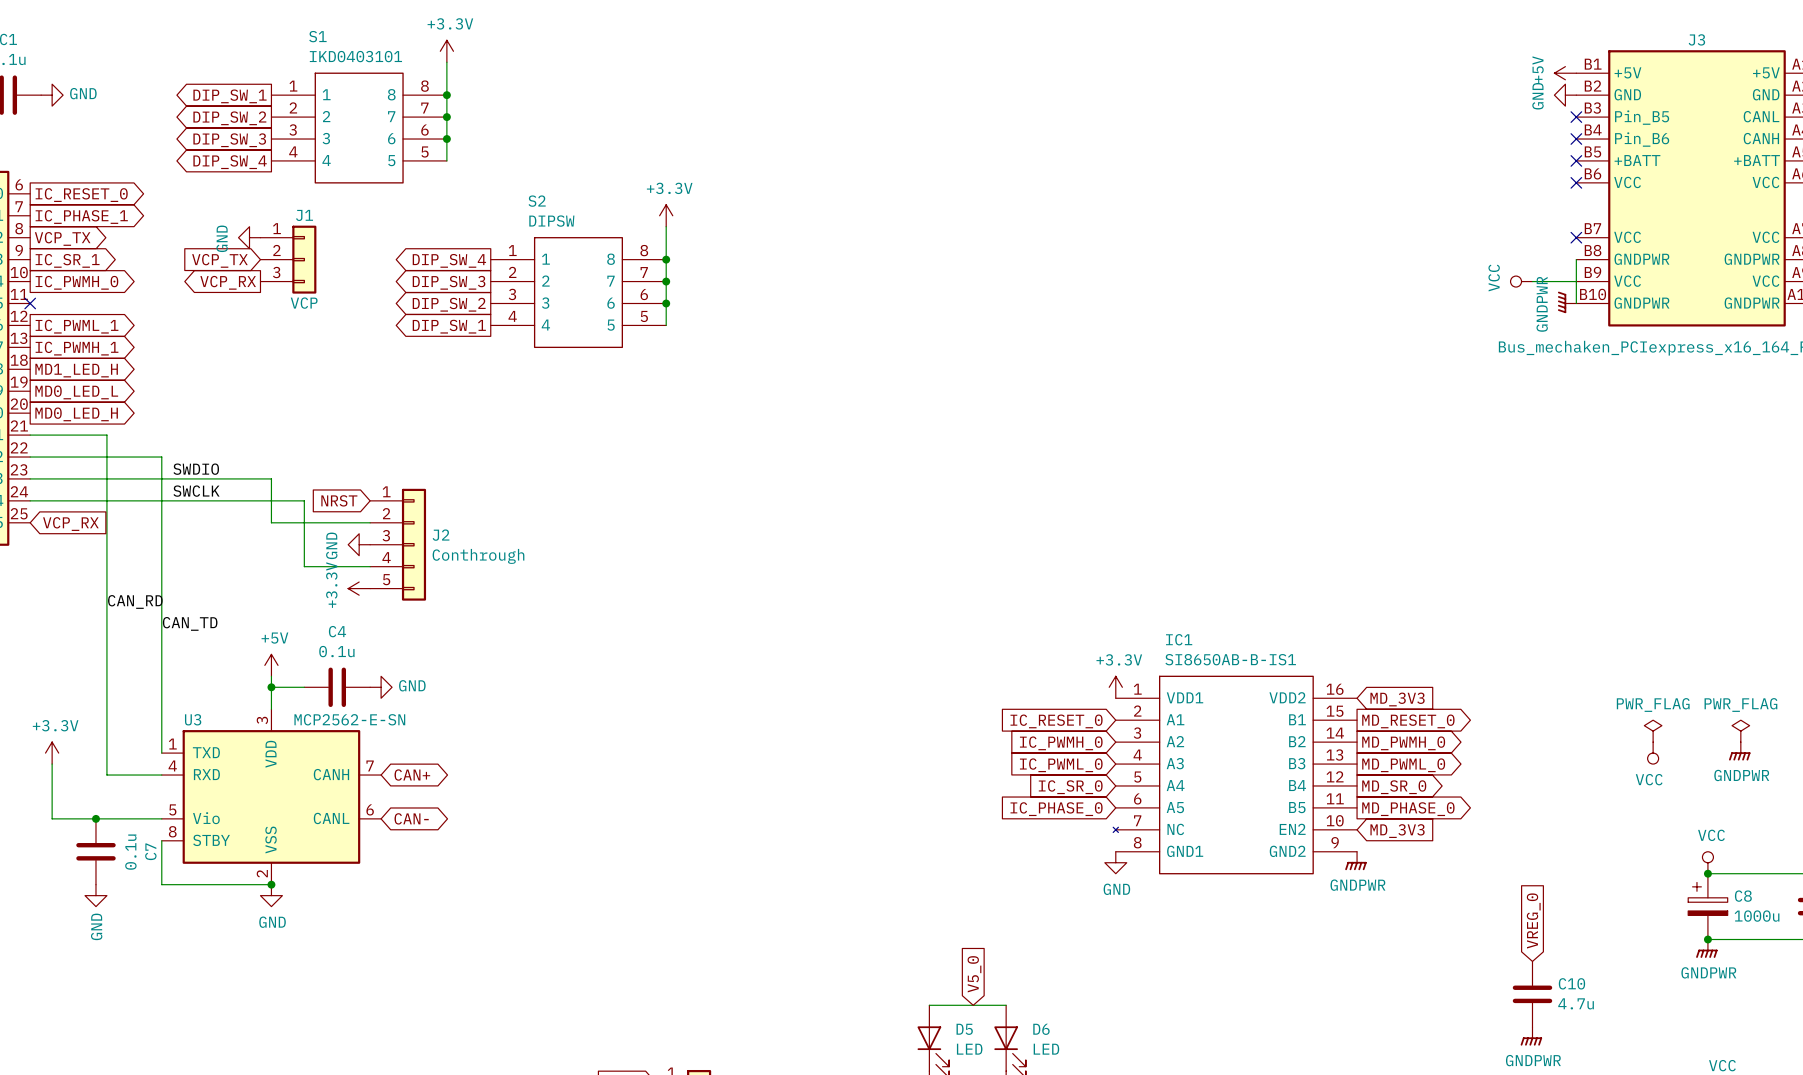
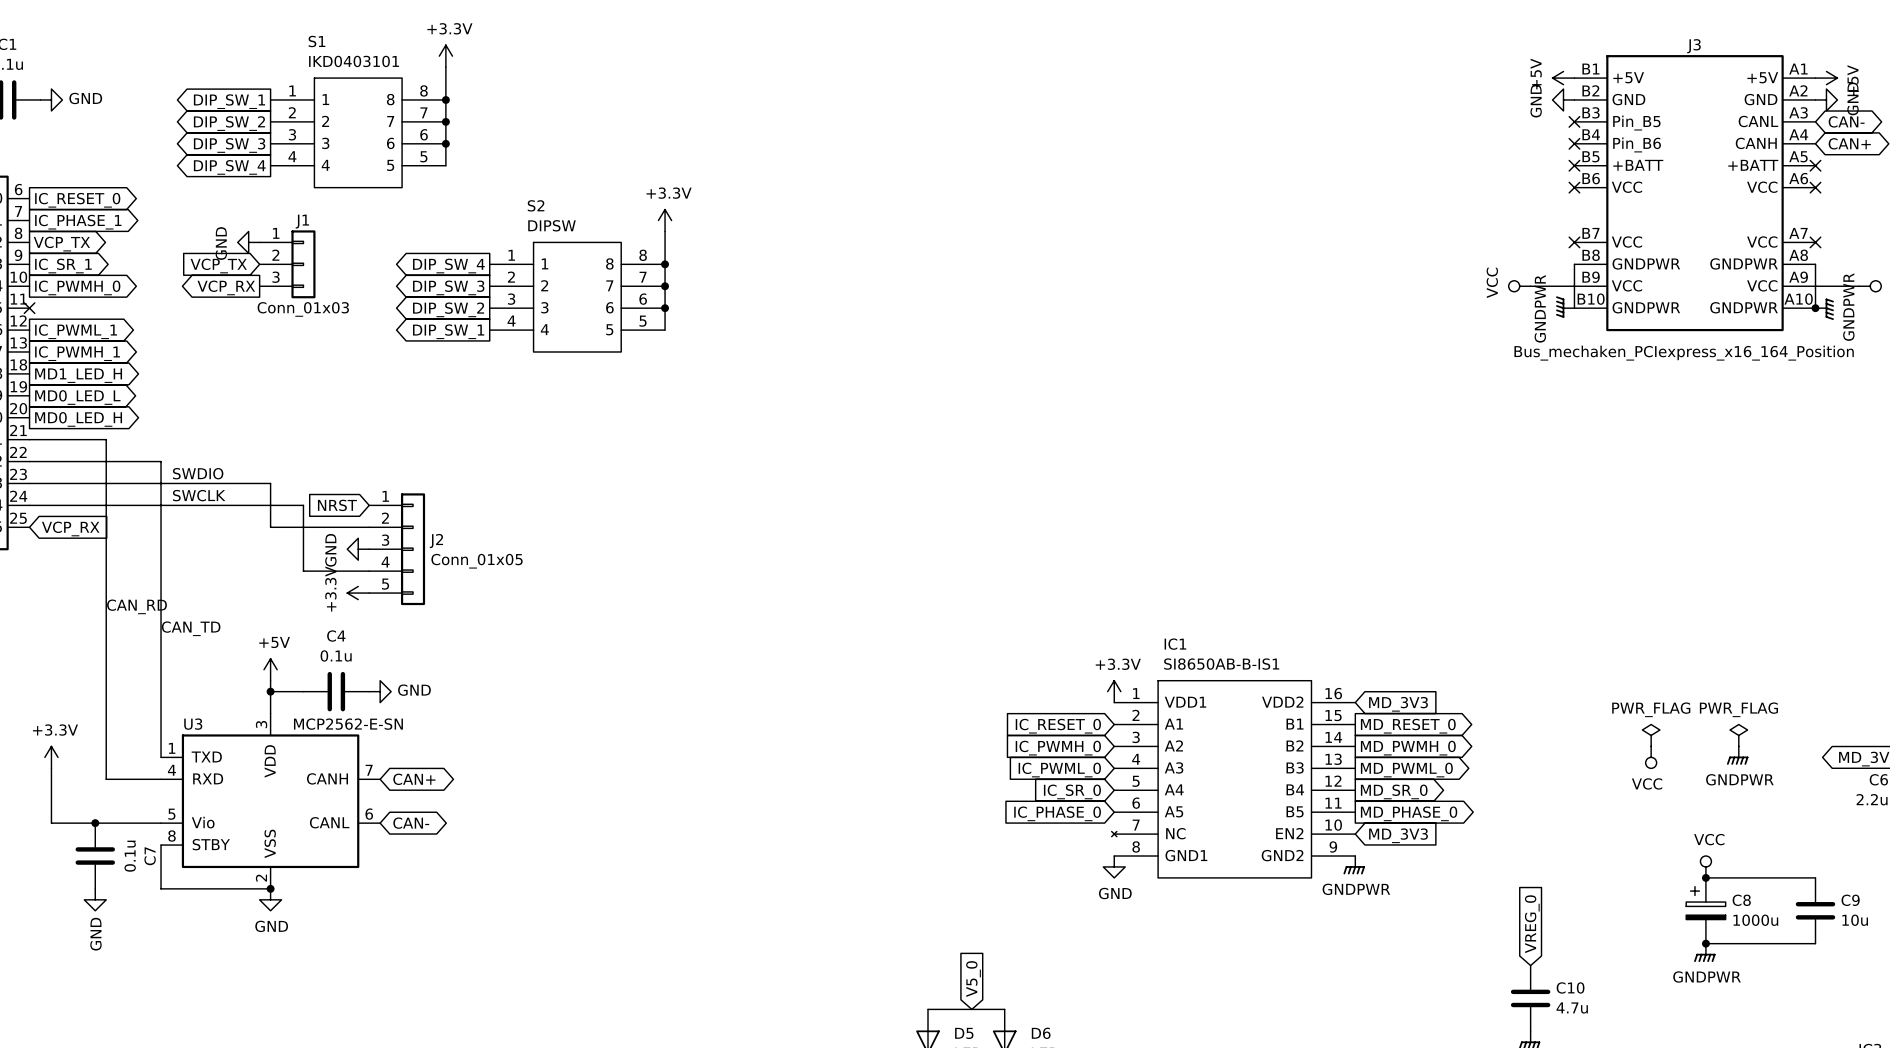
J1 value: VCP (304, 303) -> Conn_01x03 (303, 309)
J2 value: Conthrough (478, 556) -> Conn_01x05 (477, 561)

